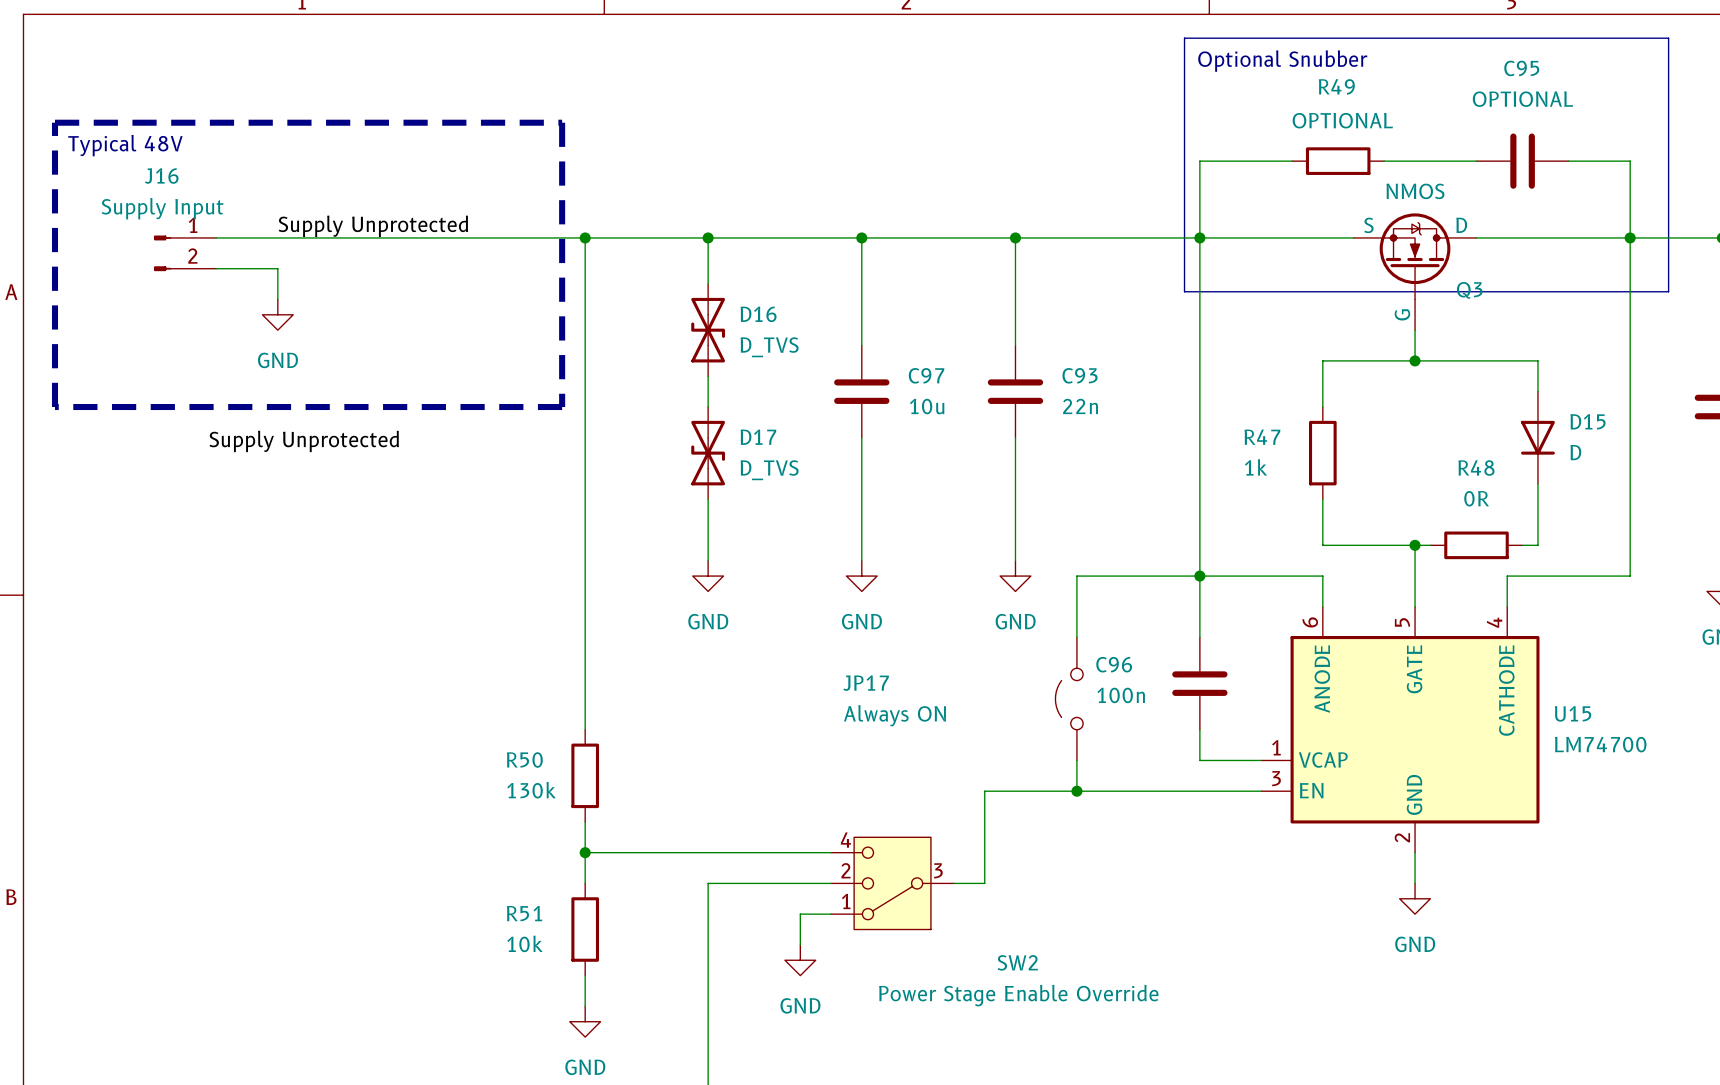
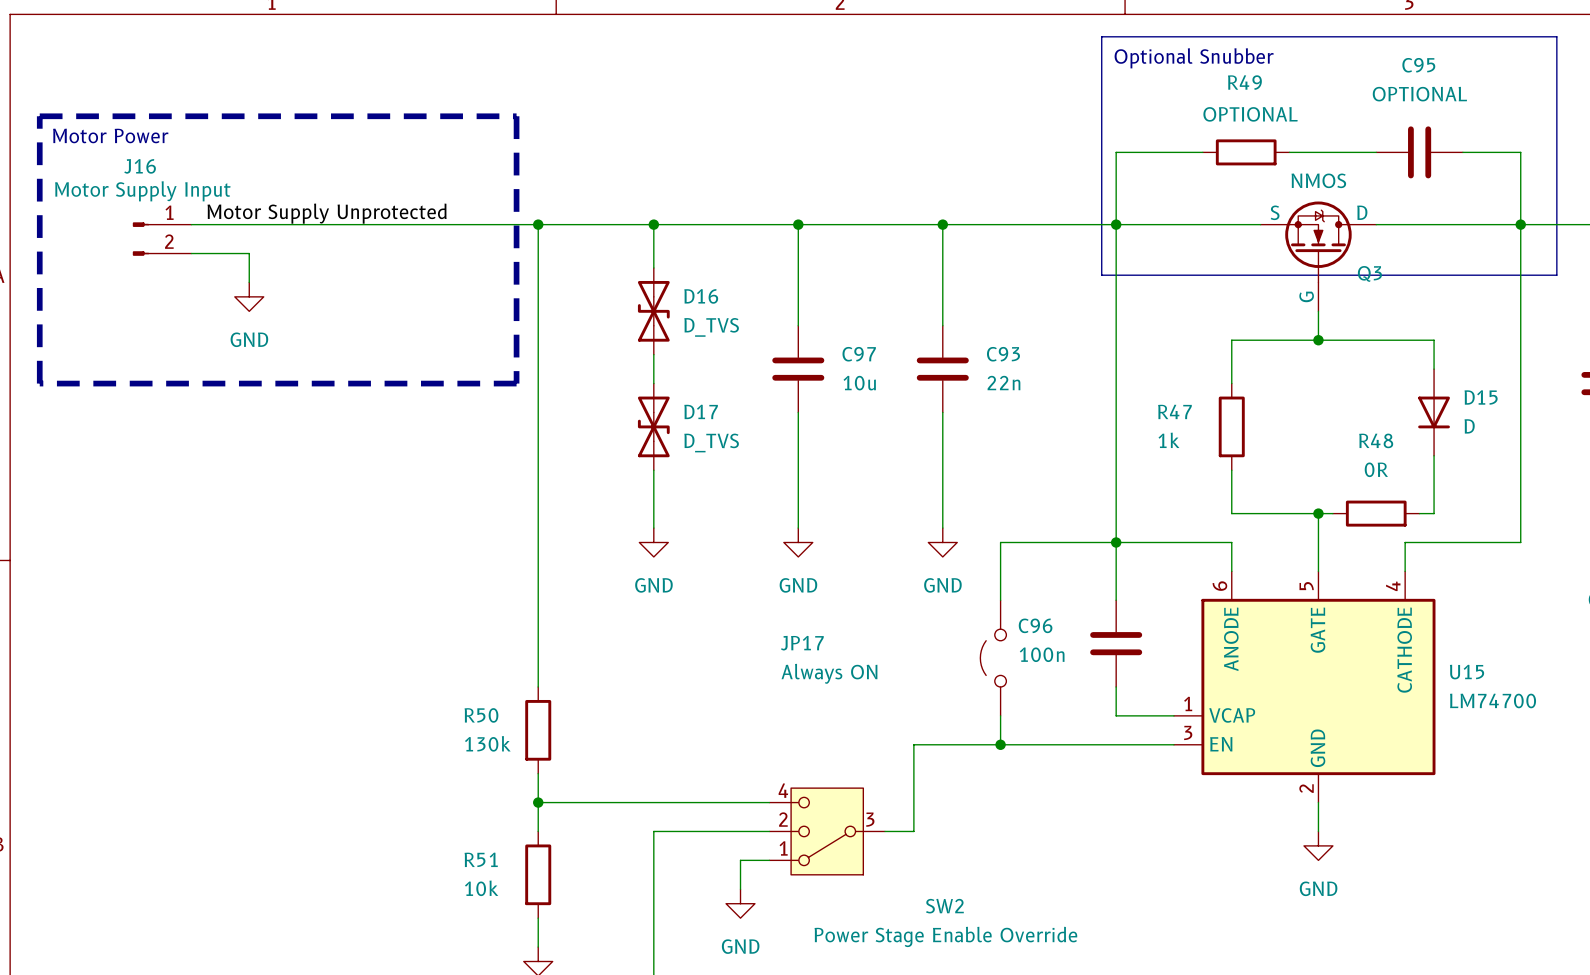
text: Typical 48V (125, 145) -> Motor Power (110, 135)
J16 value: Supply Input (162, 208) -> Motor Supply Input (142, 191)
label: Supply Unprotected (373, 226) -> Motor Supply Unprotected (327, 213)
label: Supply Unprotected (304, 441) -> none

